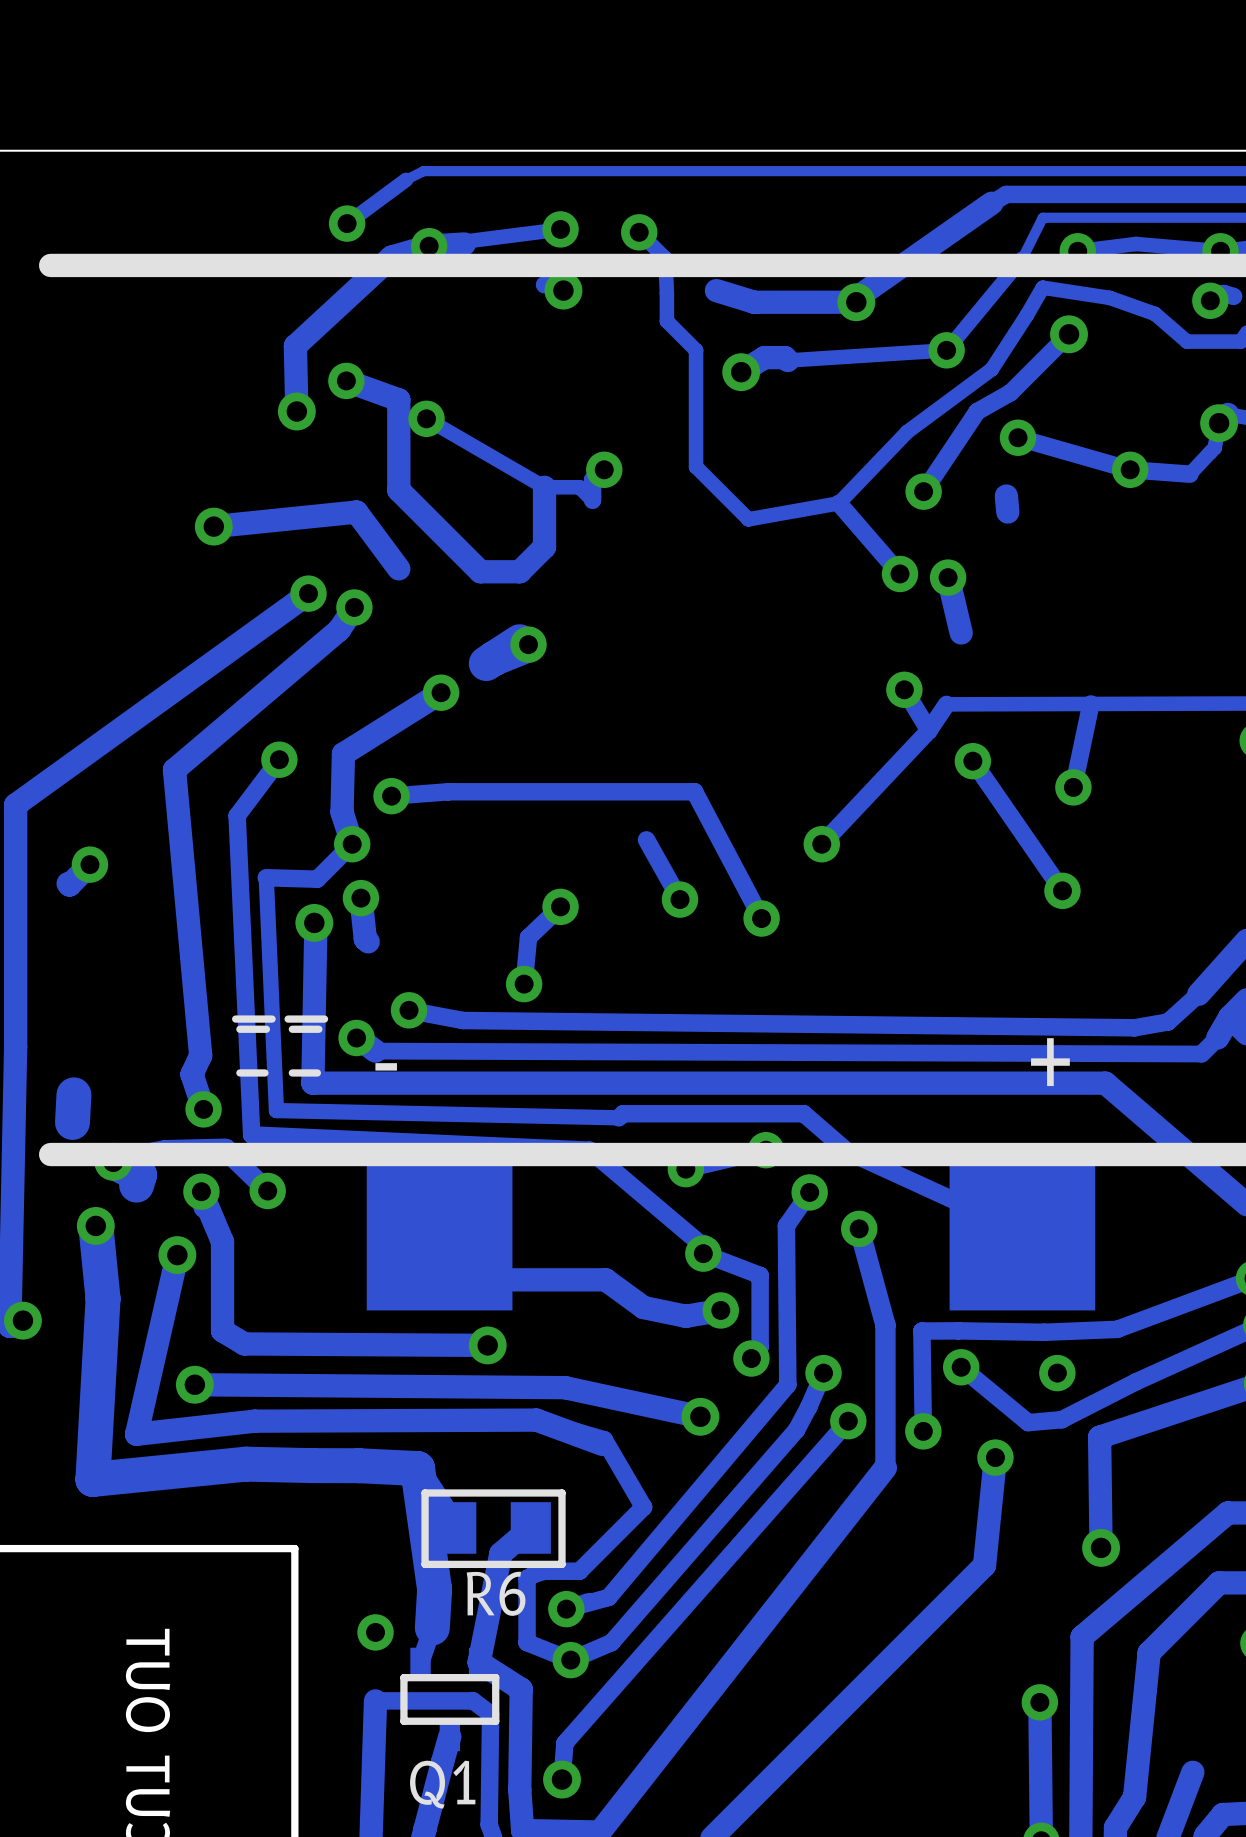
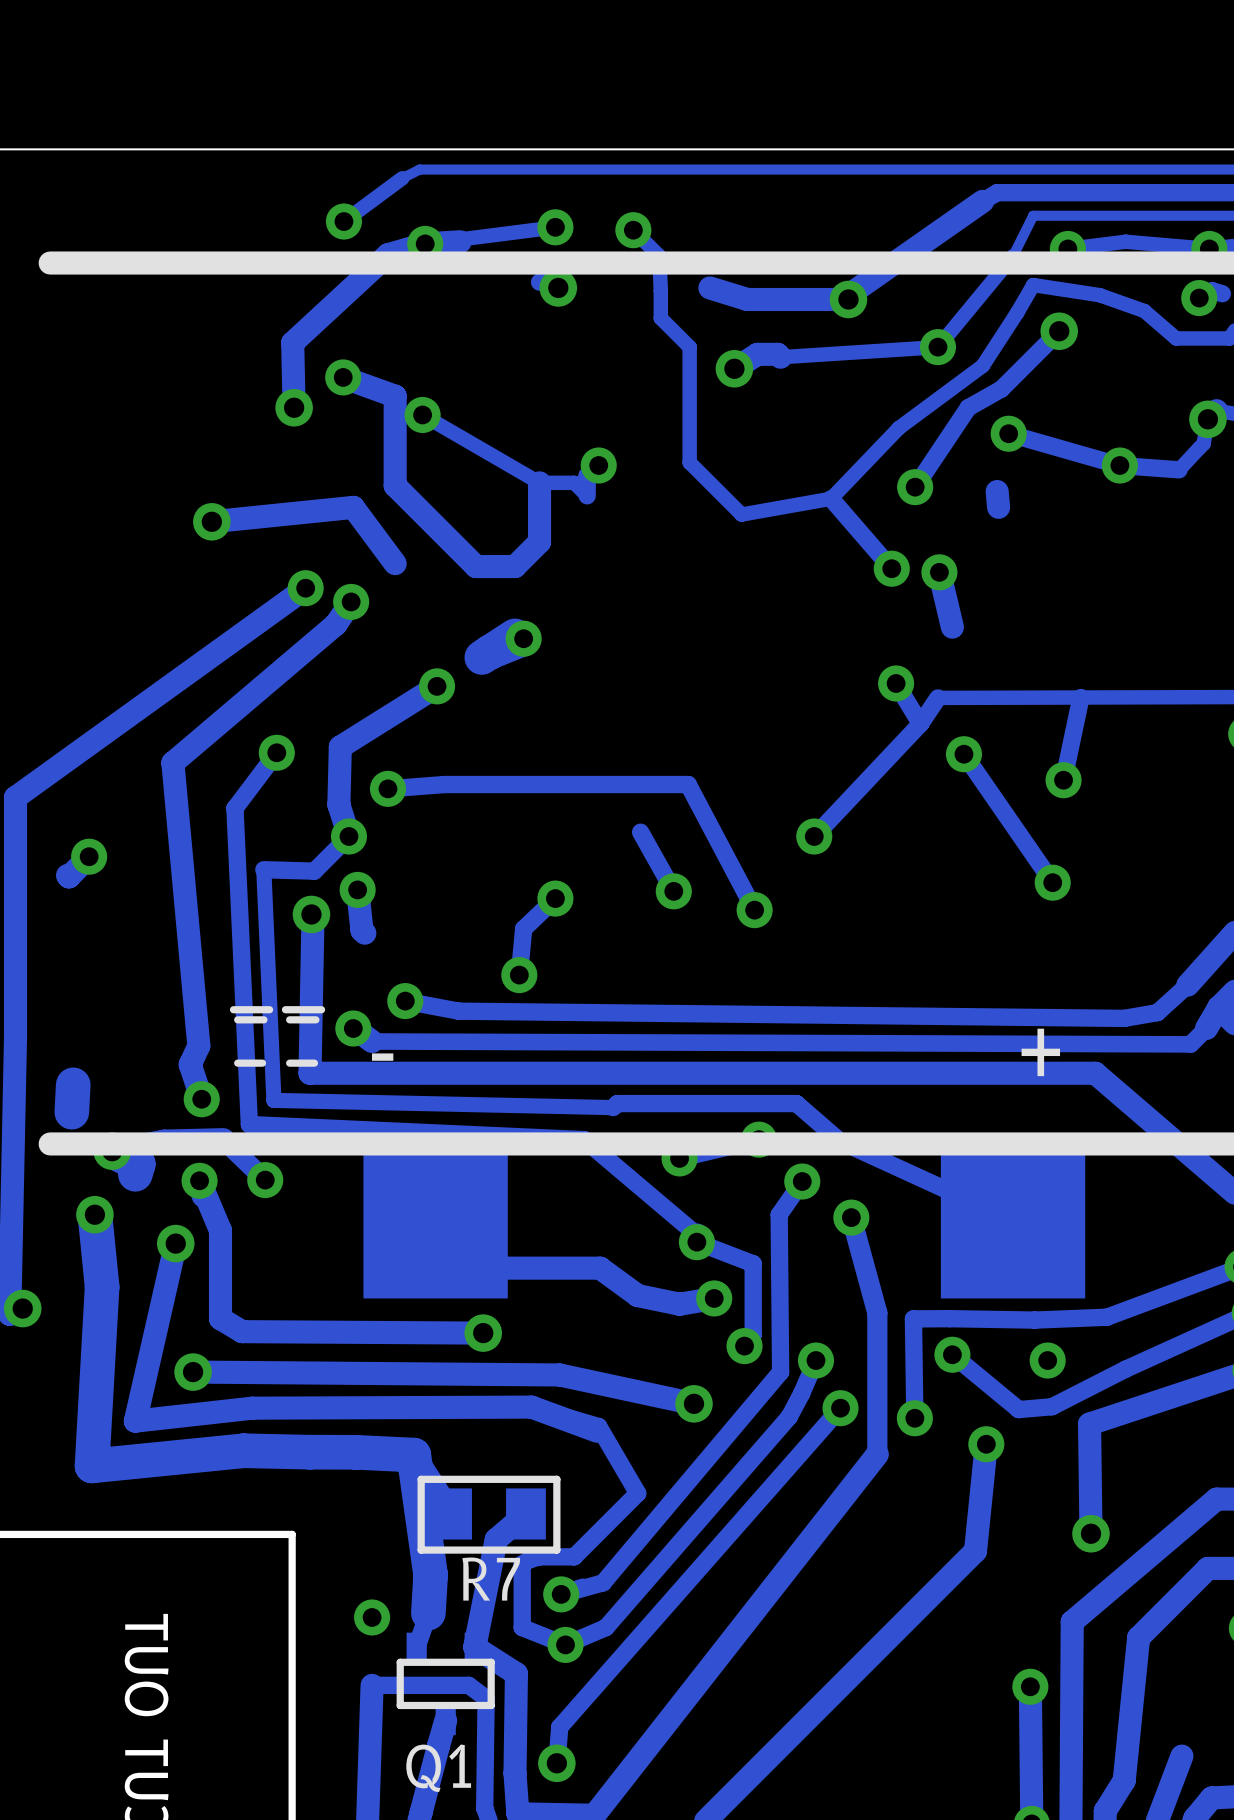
R6 name: R6 (496, 1593) -> R7 (491, 1579)

